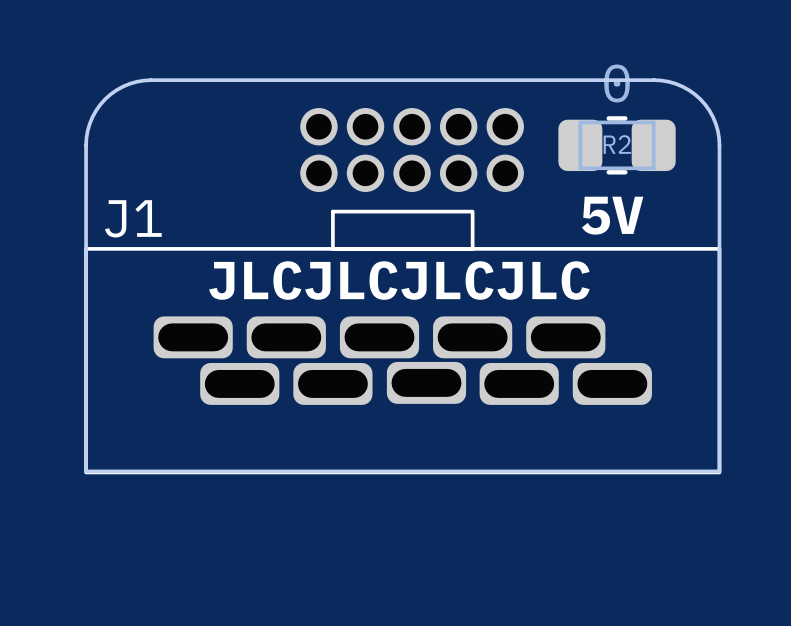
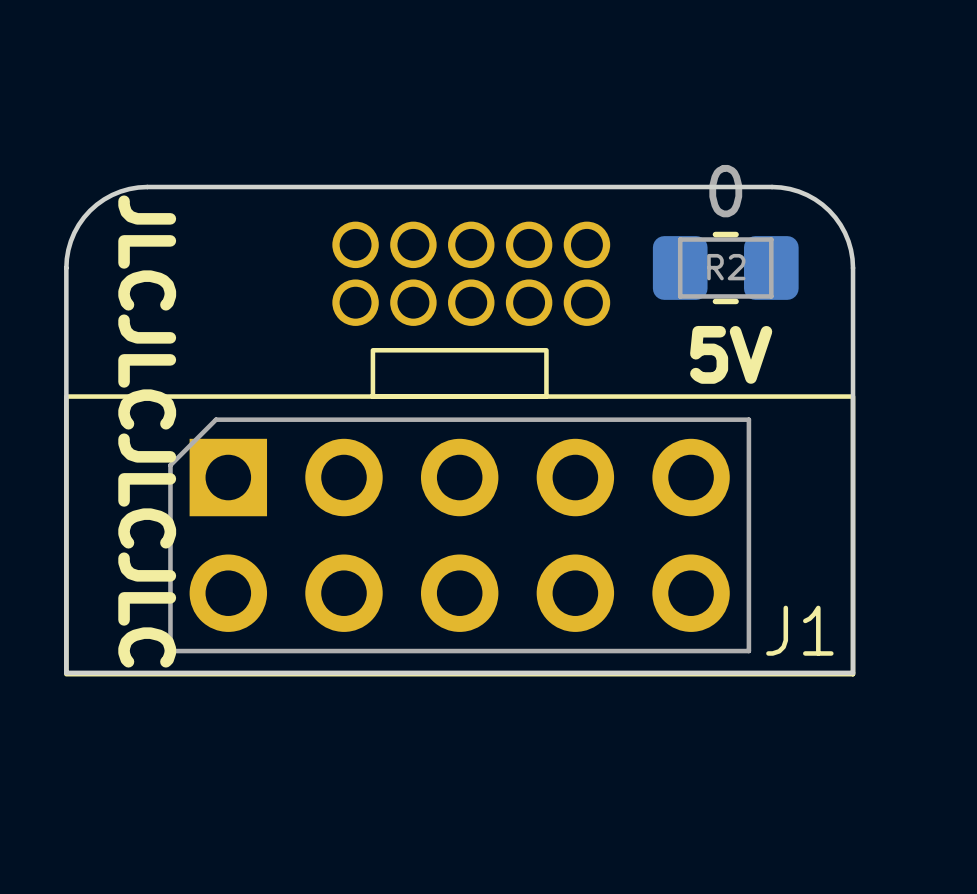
J1 footprint: [84, 209, 722, 475] -> [64, 347, 856, 677]
J1 name position: J1 (133, 218) -> J1 (799, 630)
text rotation: 0° (399, 280) -> 90° clockwise (147, 431)

